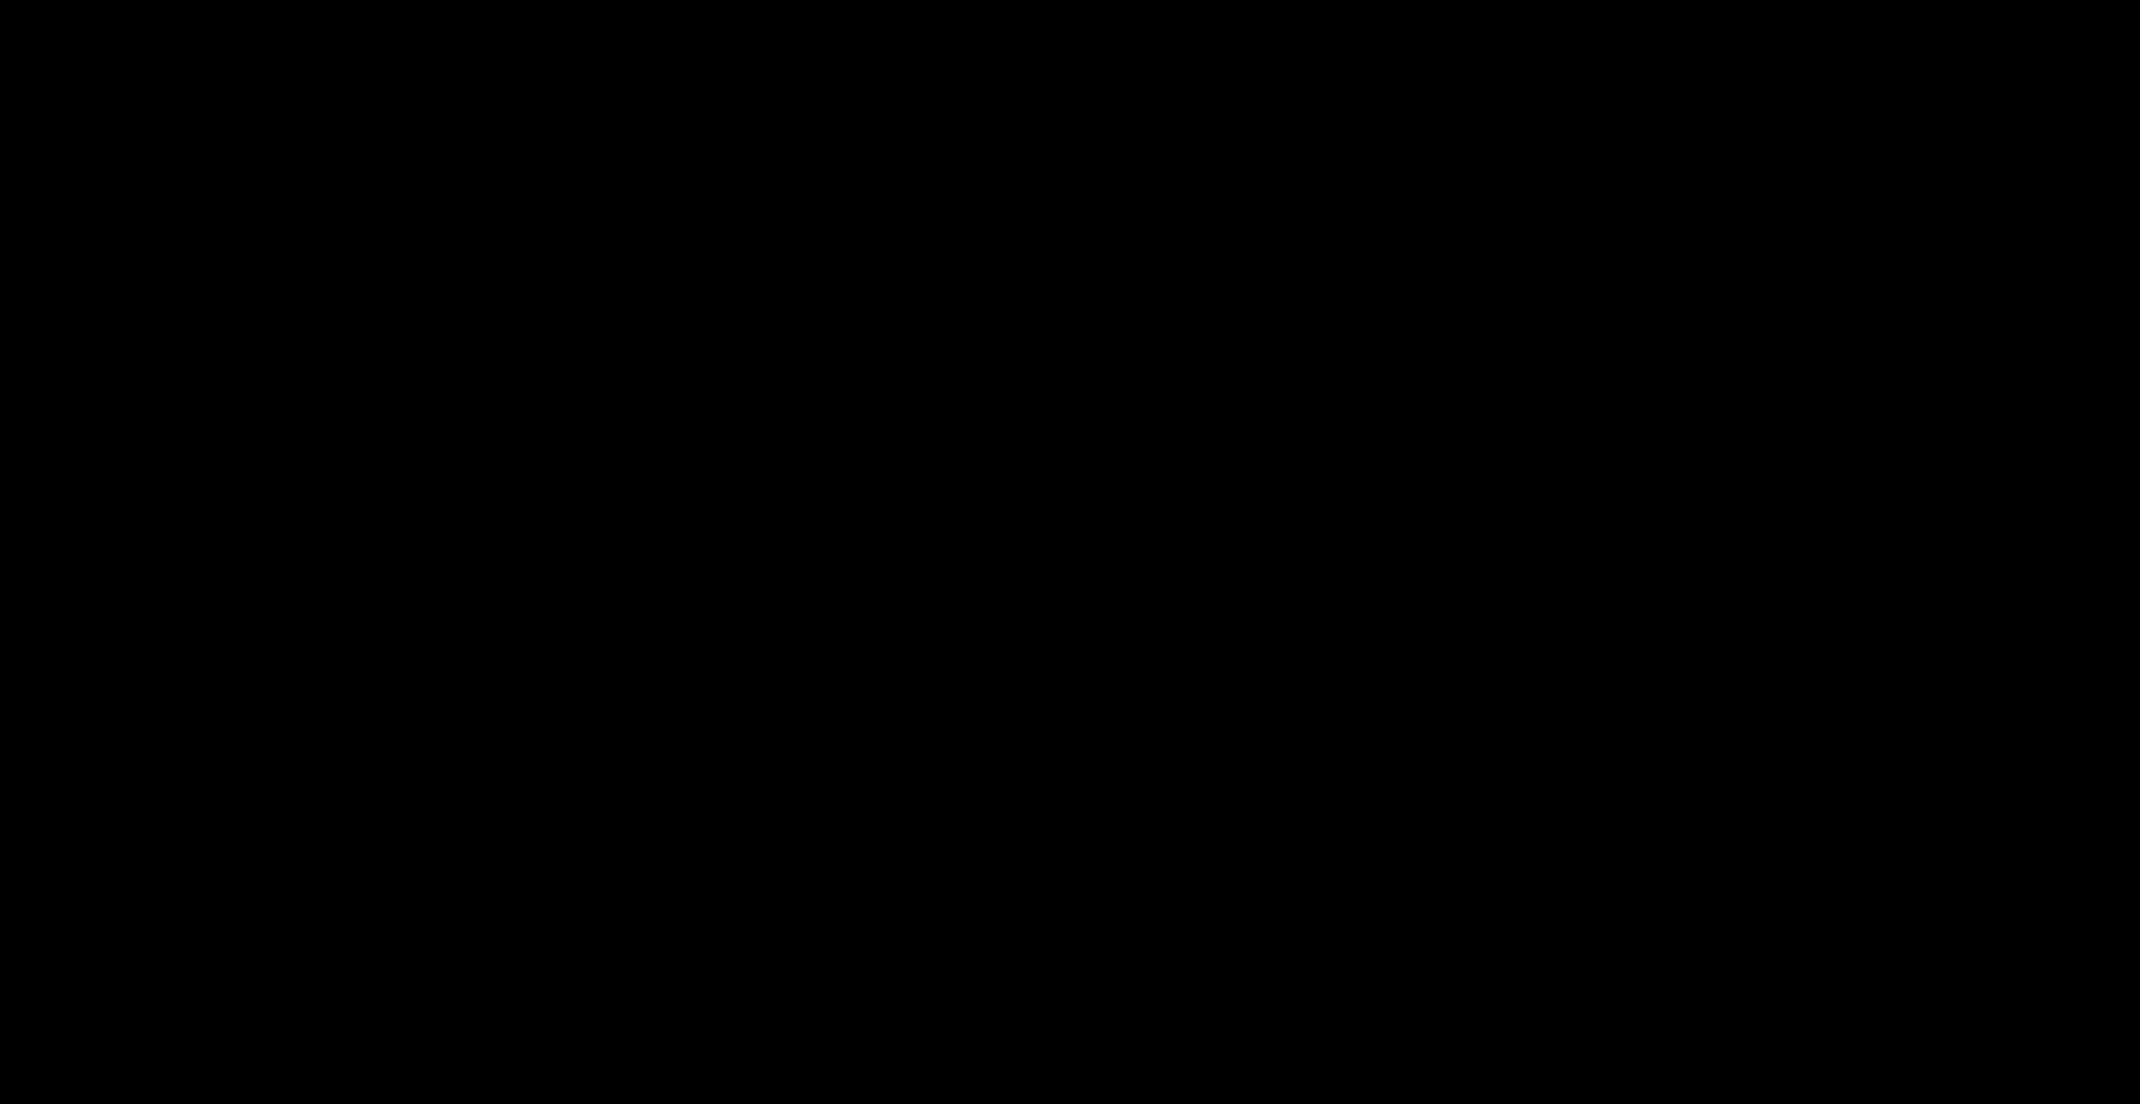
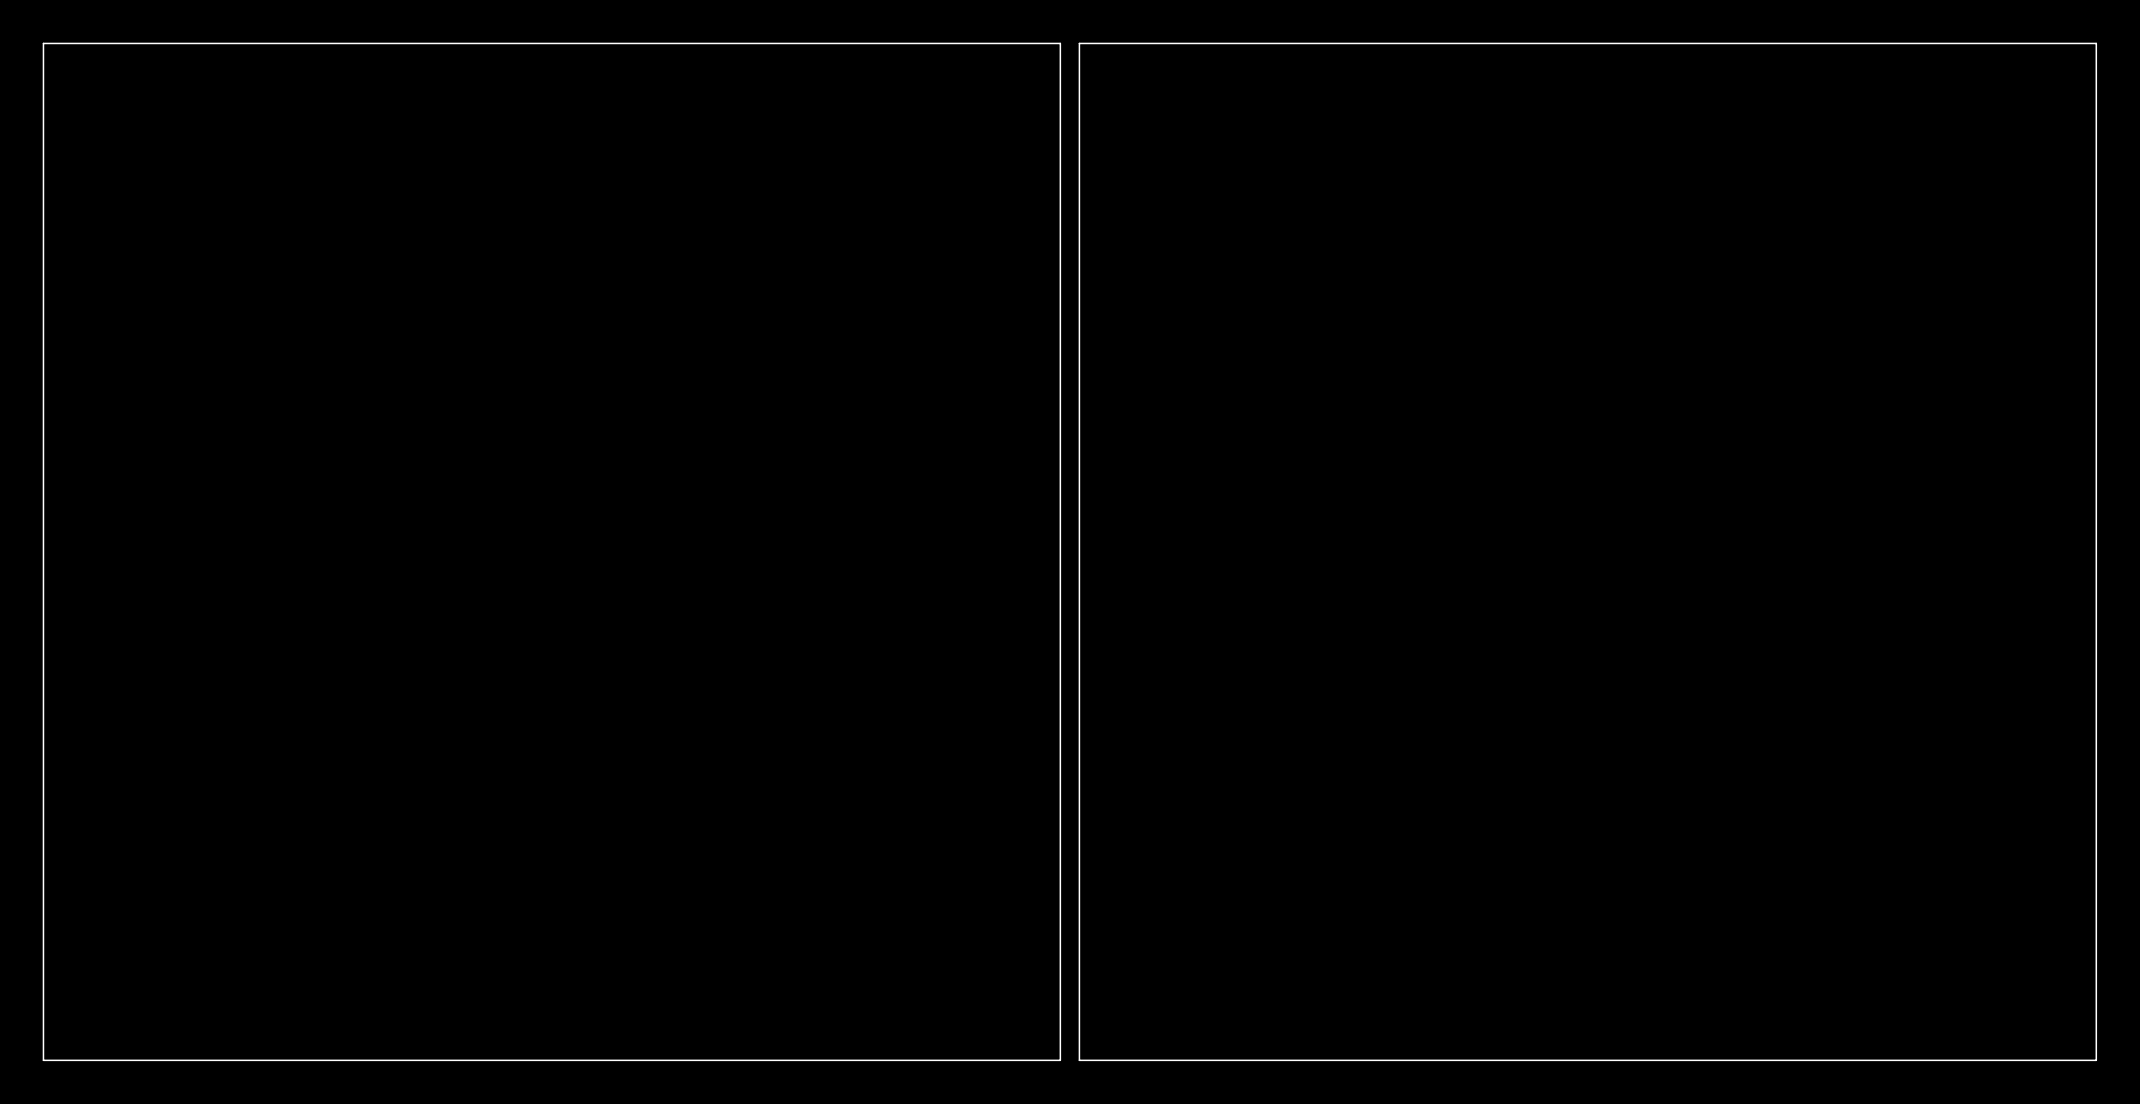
board edge: none -> (43, 43) (1060, 43) (1060, 1060) (43, 1060) (43, 43)
board edge: none -> (1079, 43) (2096, 43) (2096, 1060) (1079, 1060) (1079, 43)

